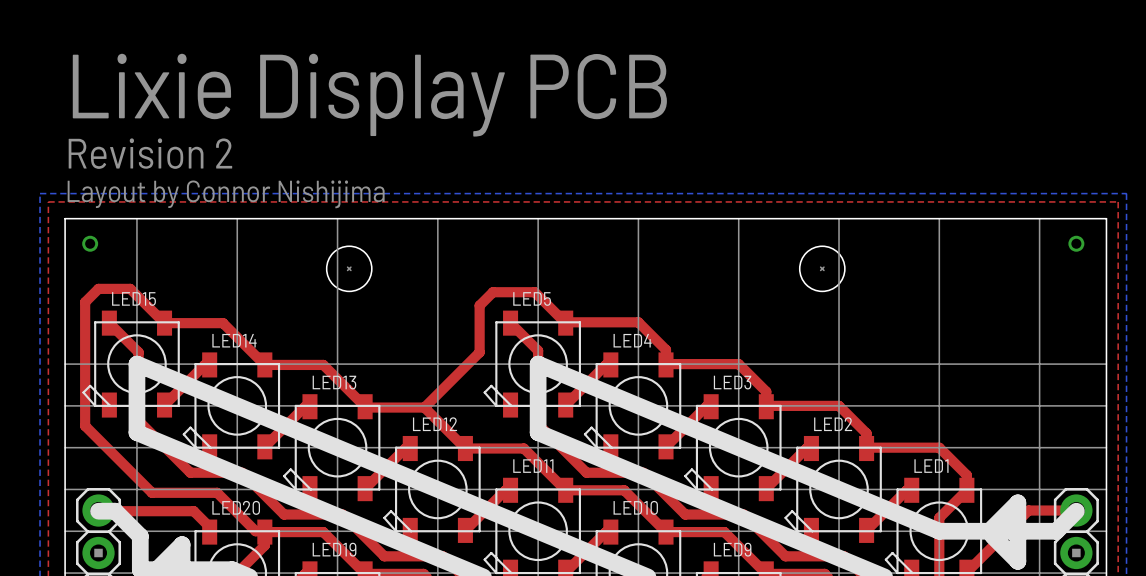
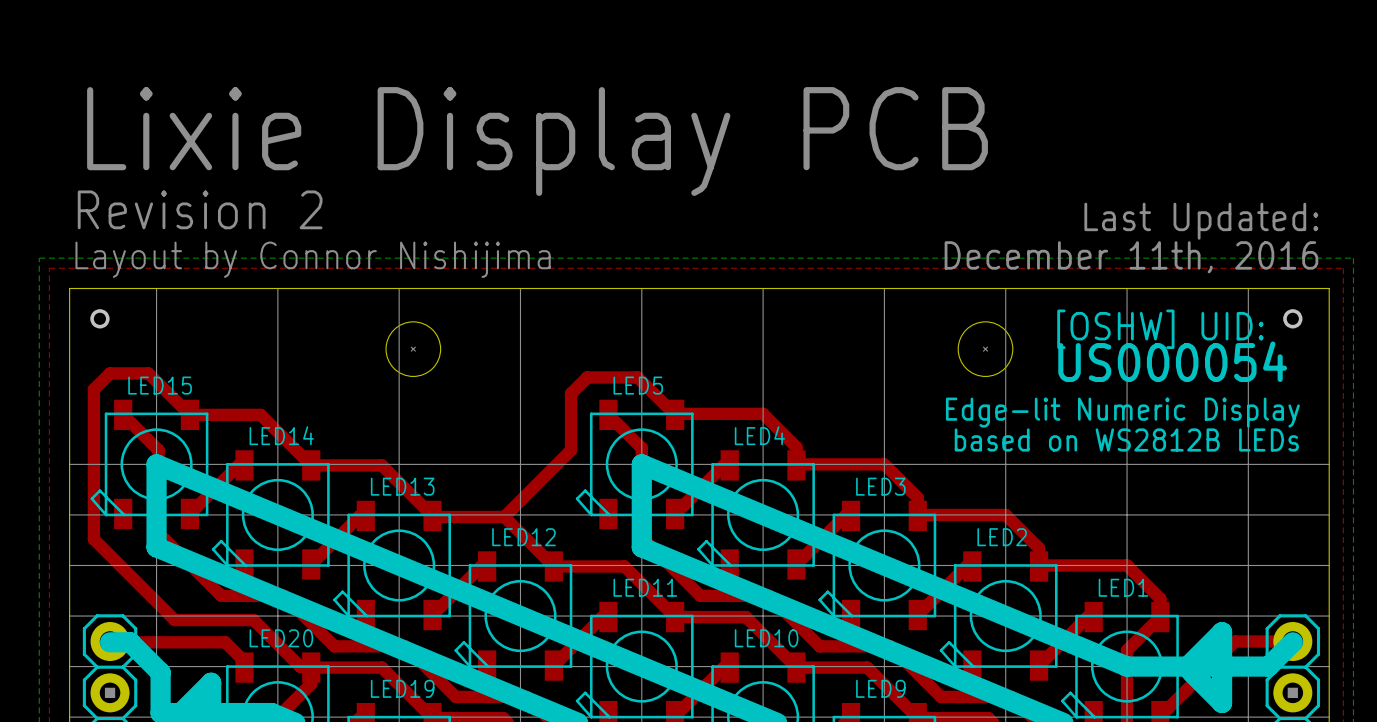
text: none -> Last Updated: (1201, 221)
text: none -> December 11th, 2016 (1131, 257)
text: none -> [OSHW] UID: (1160, 329)
text: none -> US000054 (1172, 361)
text: none -> Edge-lit Numeric Display (1122, 412)
text: none -> based on WS2812B LEDs (1126, 439)

